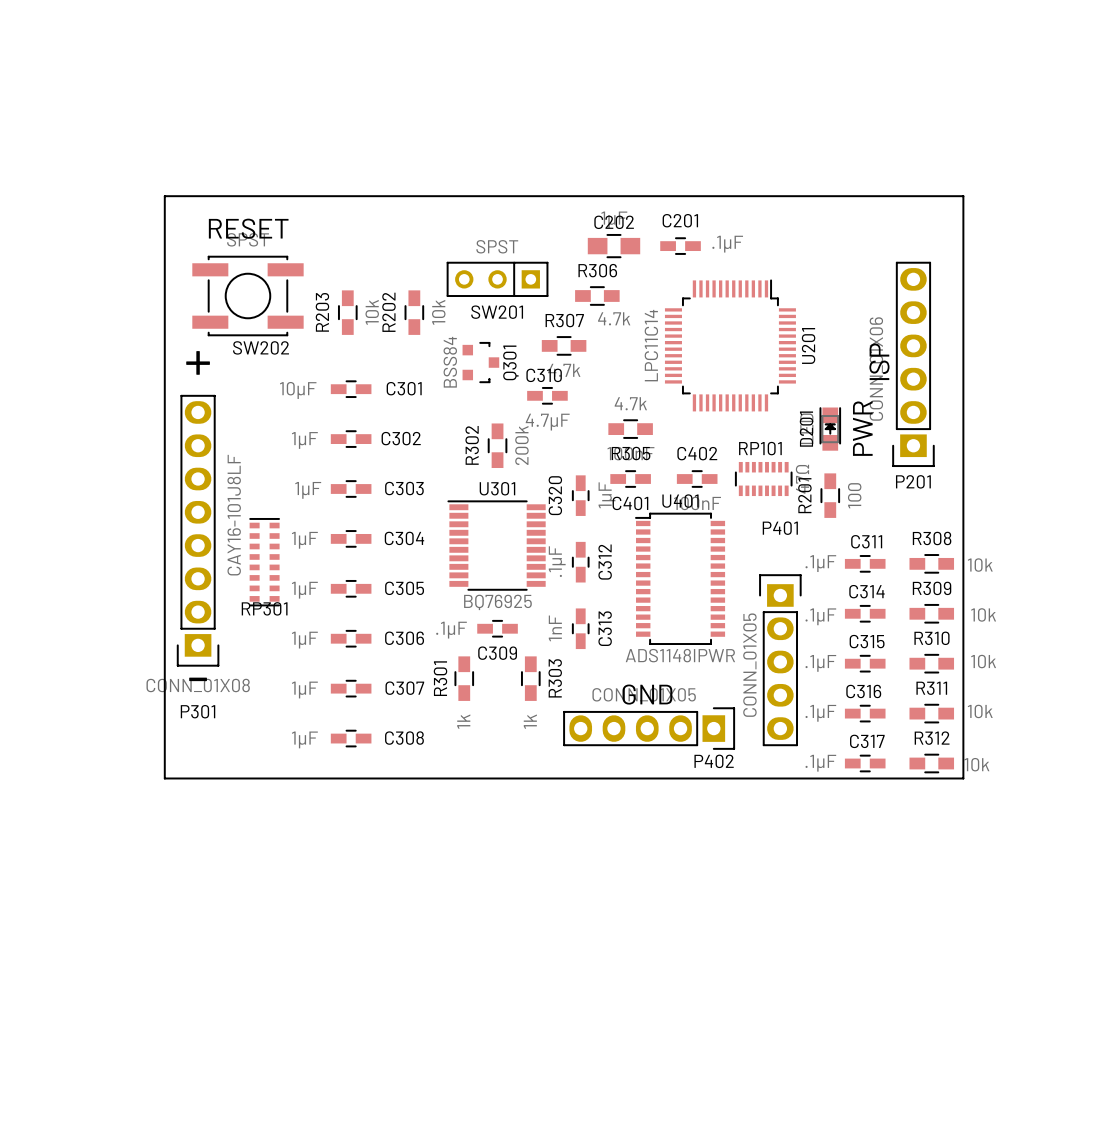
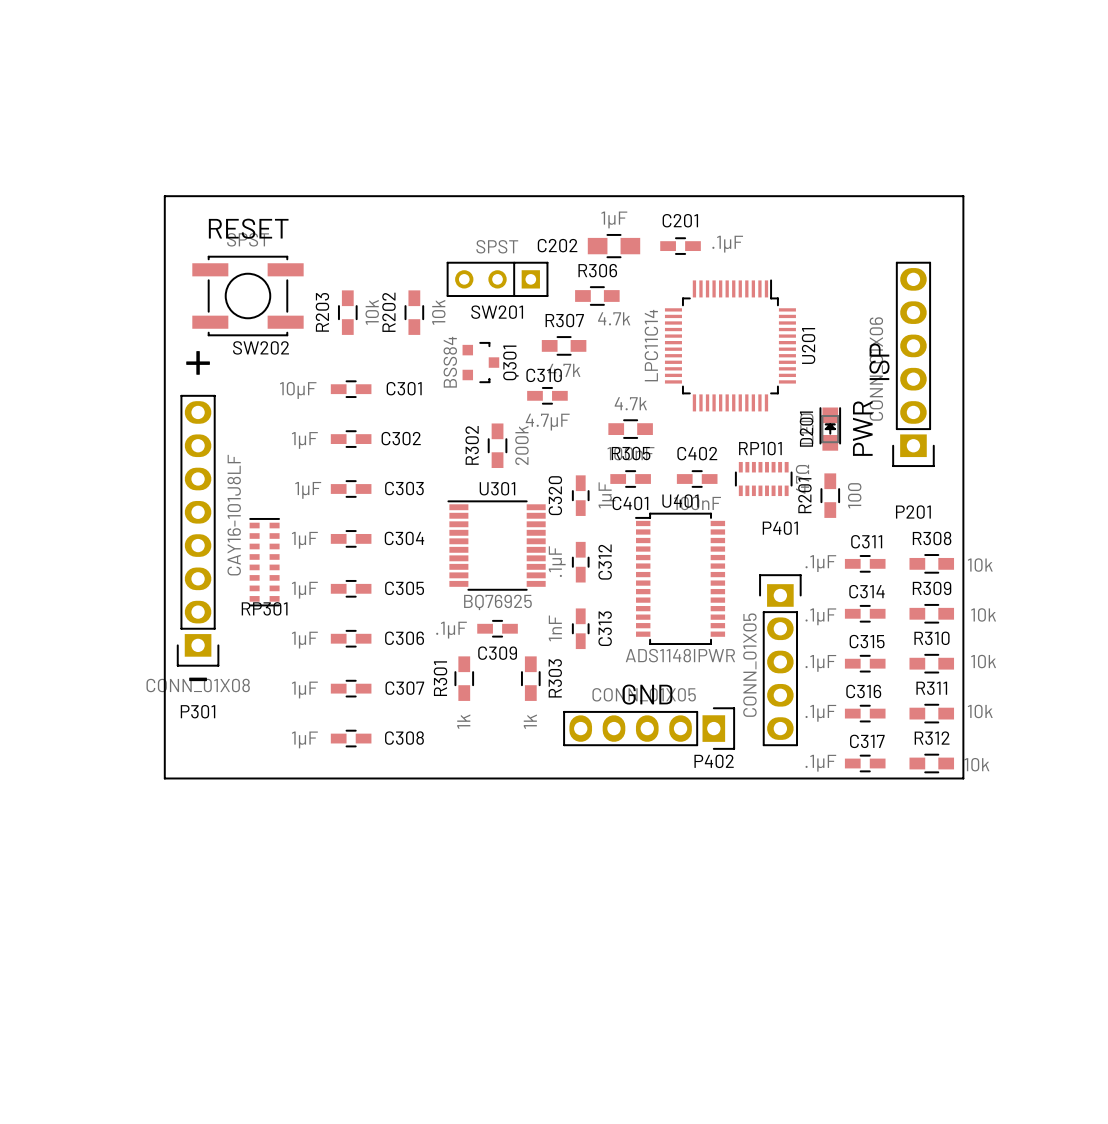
C202 name position: C202 (614, 222) -> C202 (557, 245)
P201 name position: P201 (913, 481) -> P201 (913, 512)

